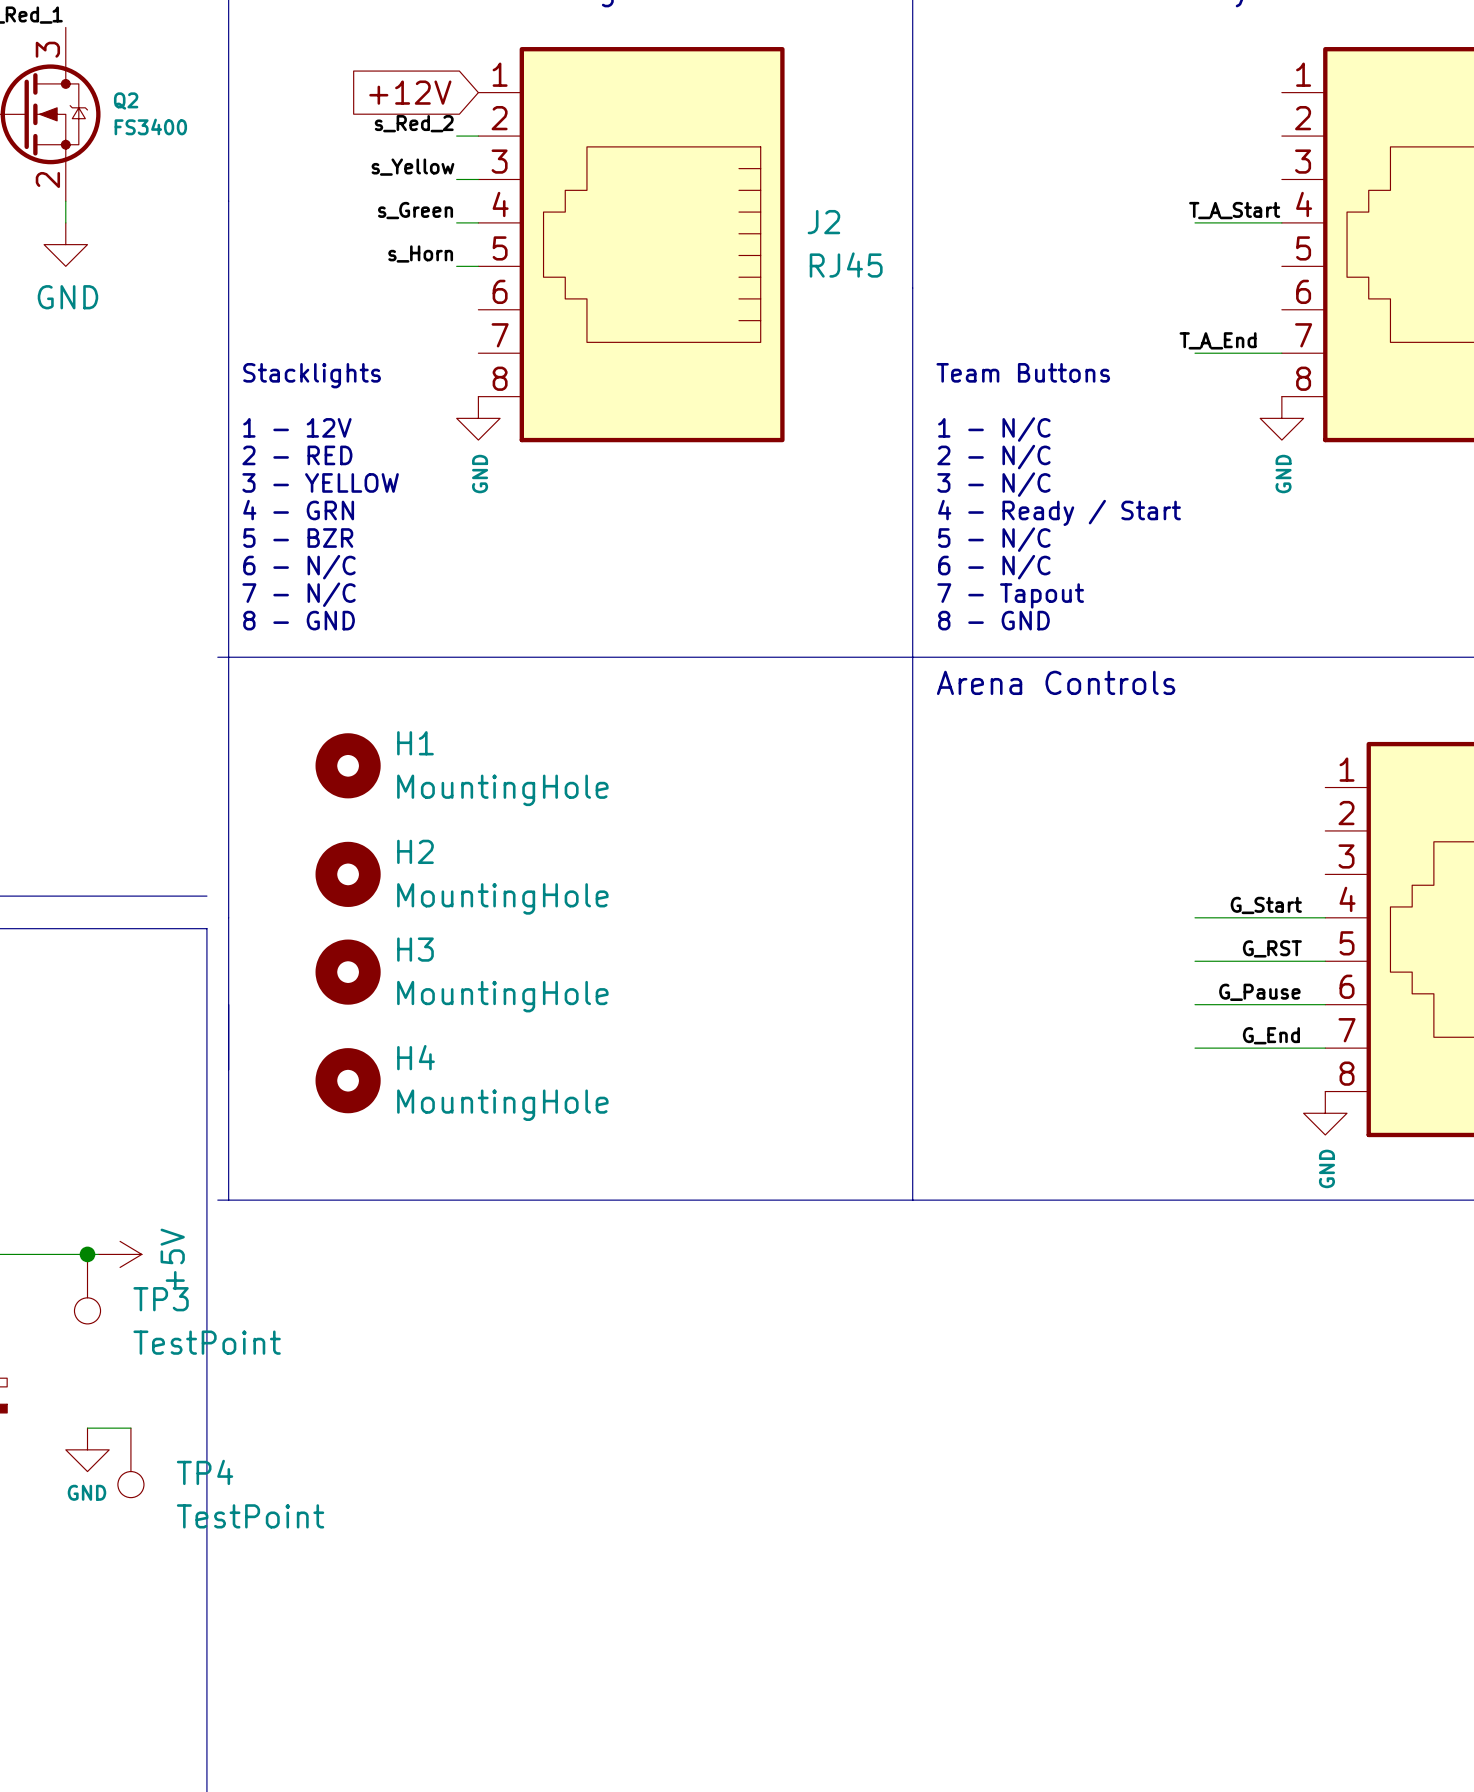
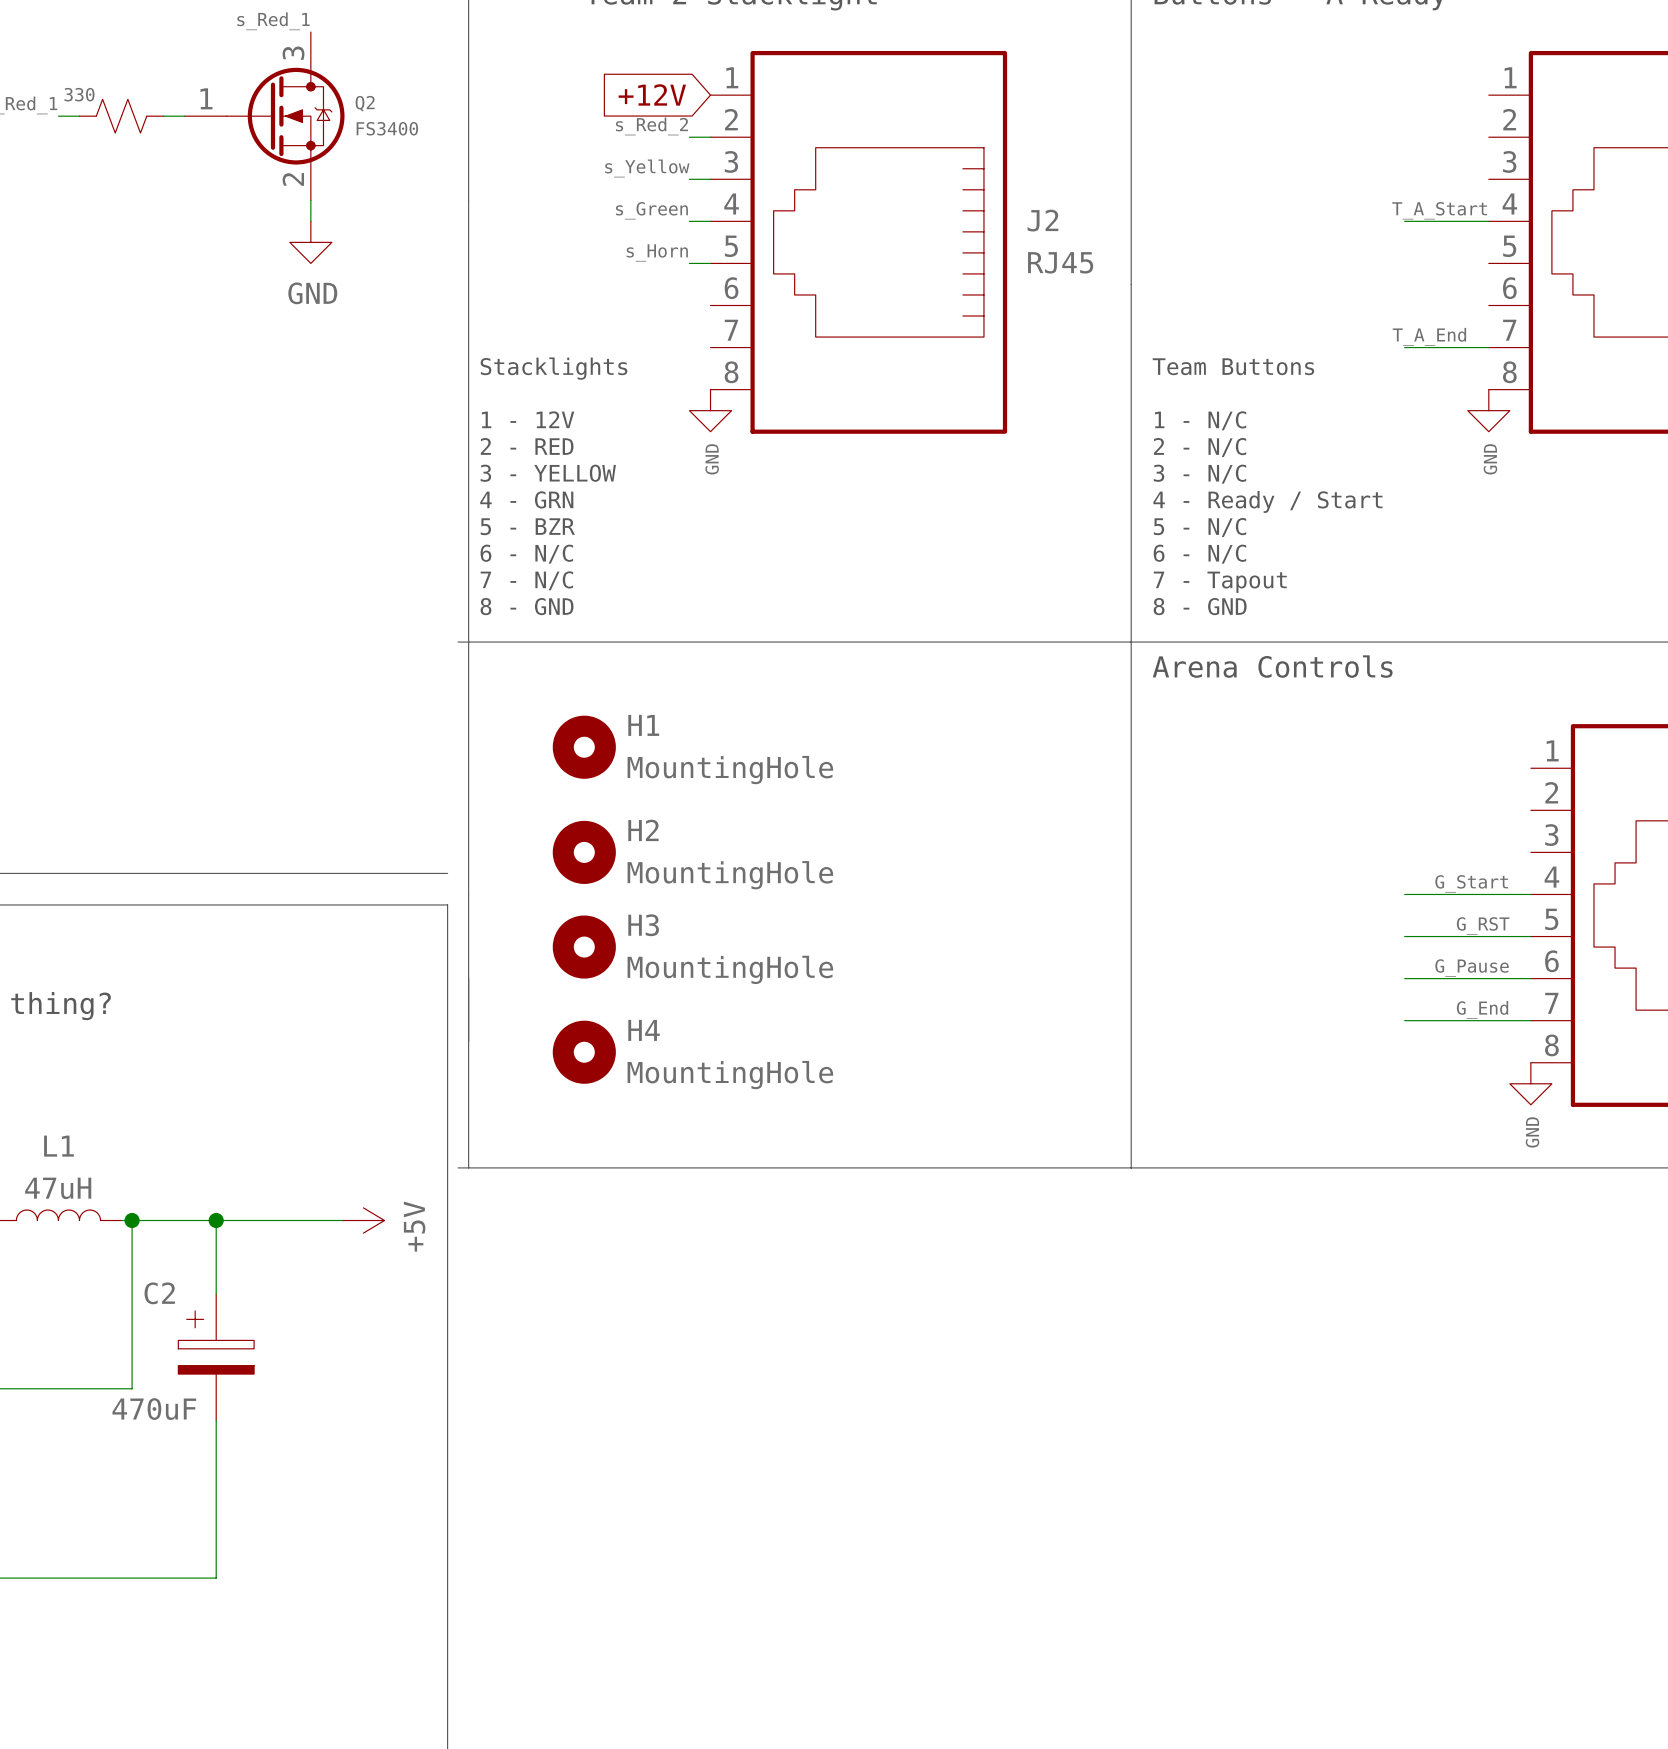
junction: (87, 1254) -> none
TP3: TestPoint (87, 1289) -> none
wire: (87, 1428) (130, 1428) -> none
power symbol: GND (87, 1449) -> none
TP4: TestPoint (130, 1462) -> none

